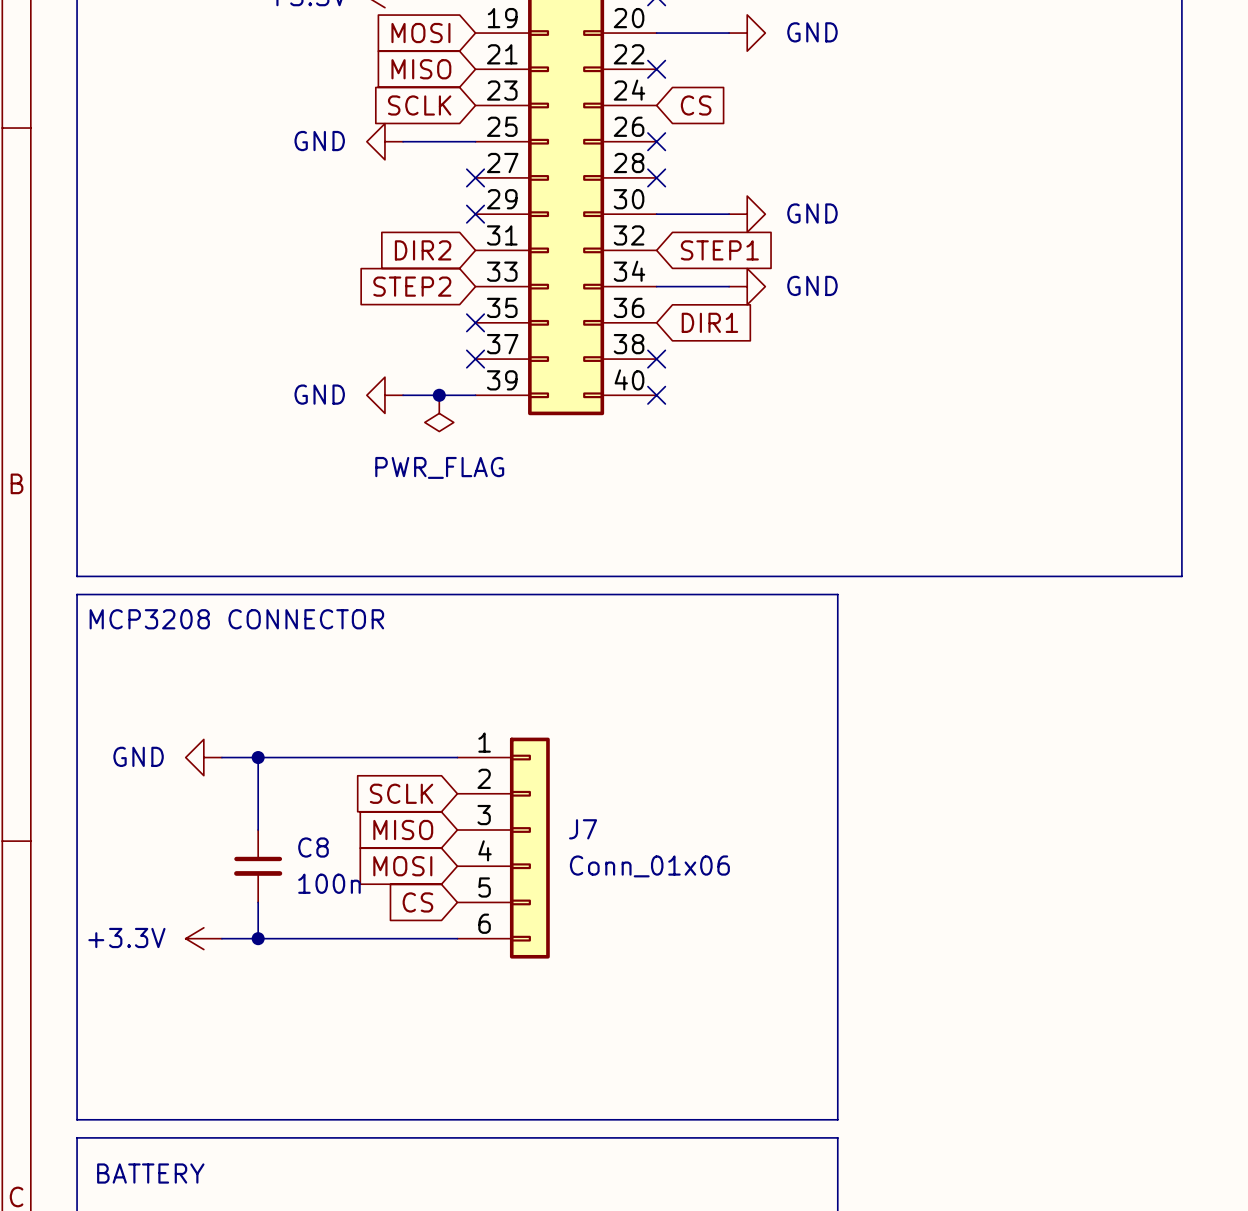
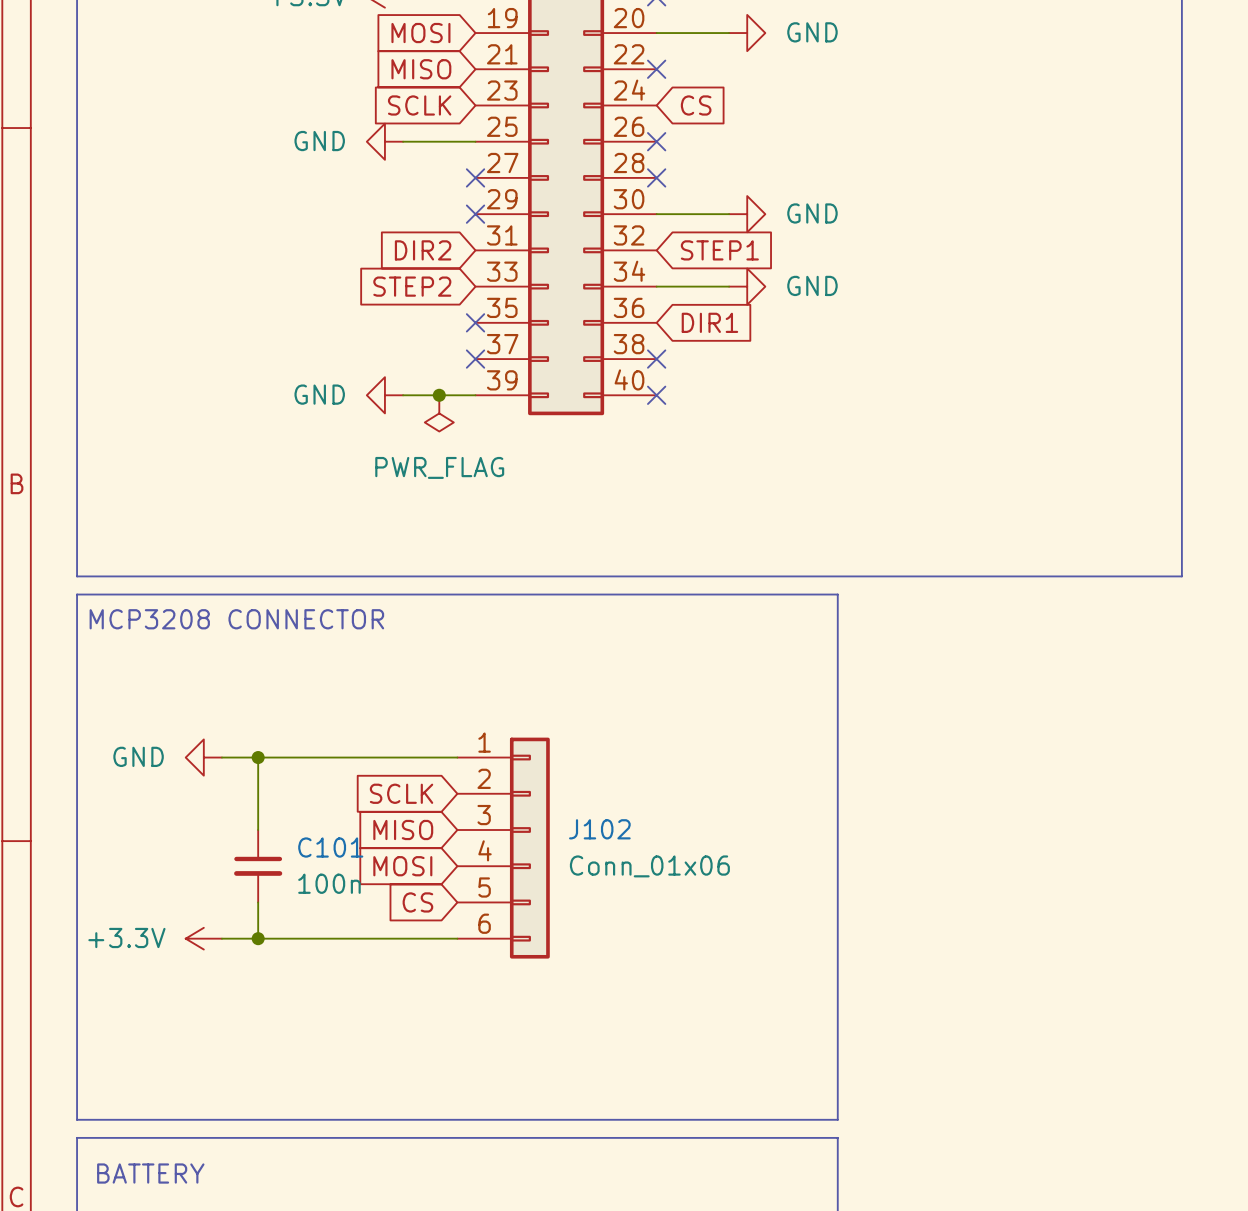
J7 name: J7 (583, 829) -> J102 (599, 829)
C8 name: C8 (313, 847) -> C101 (330, 847)

